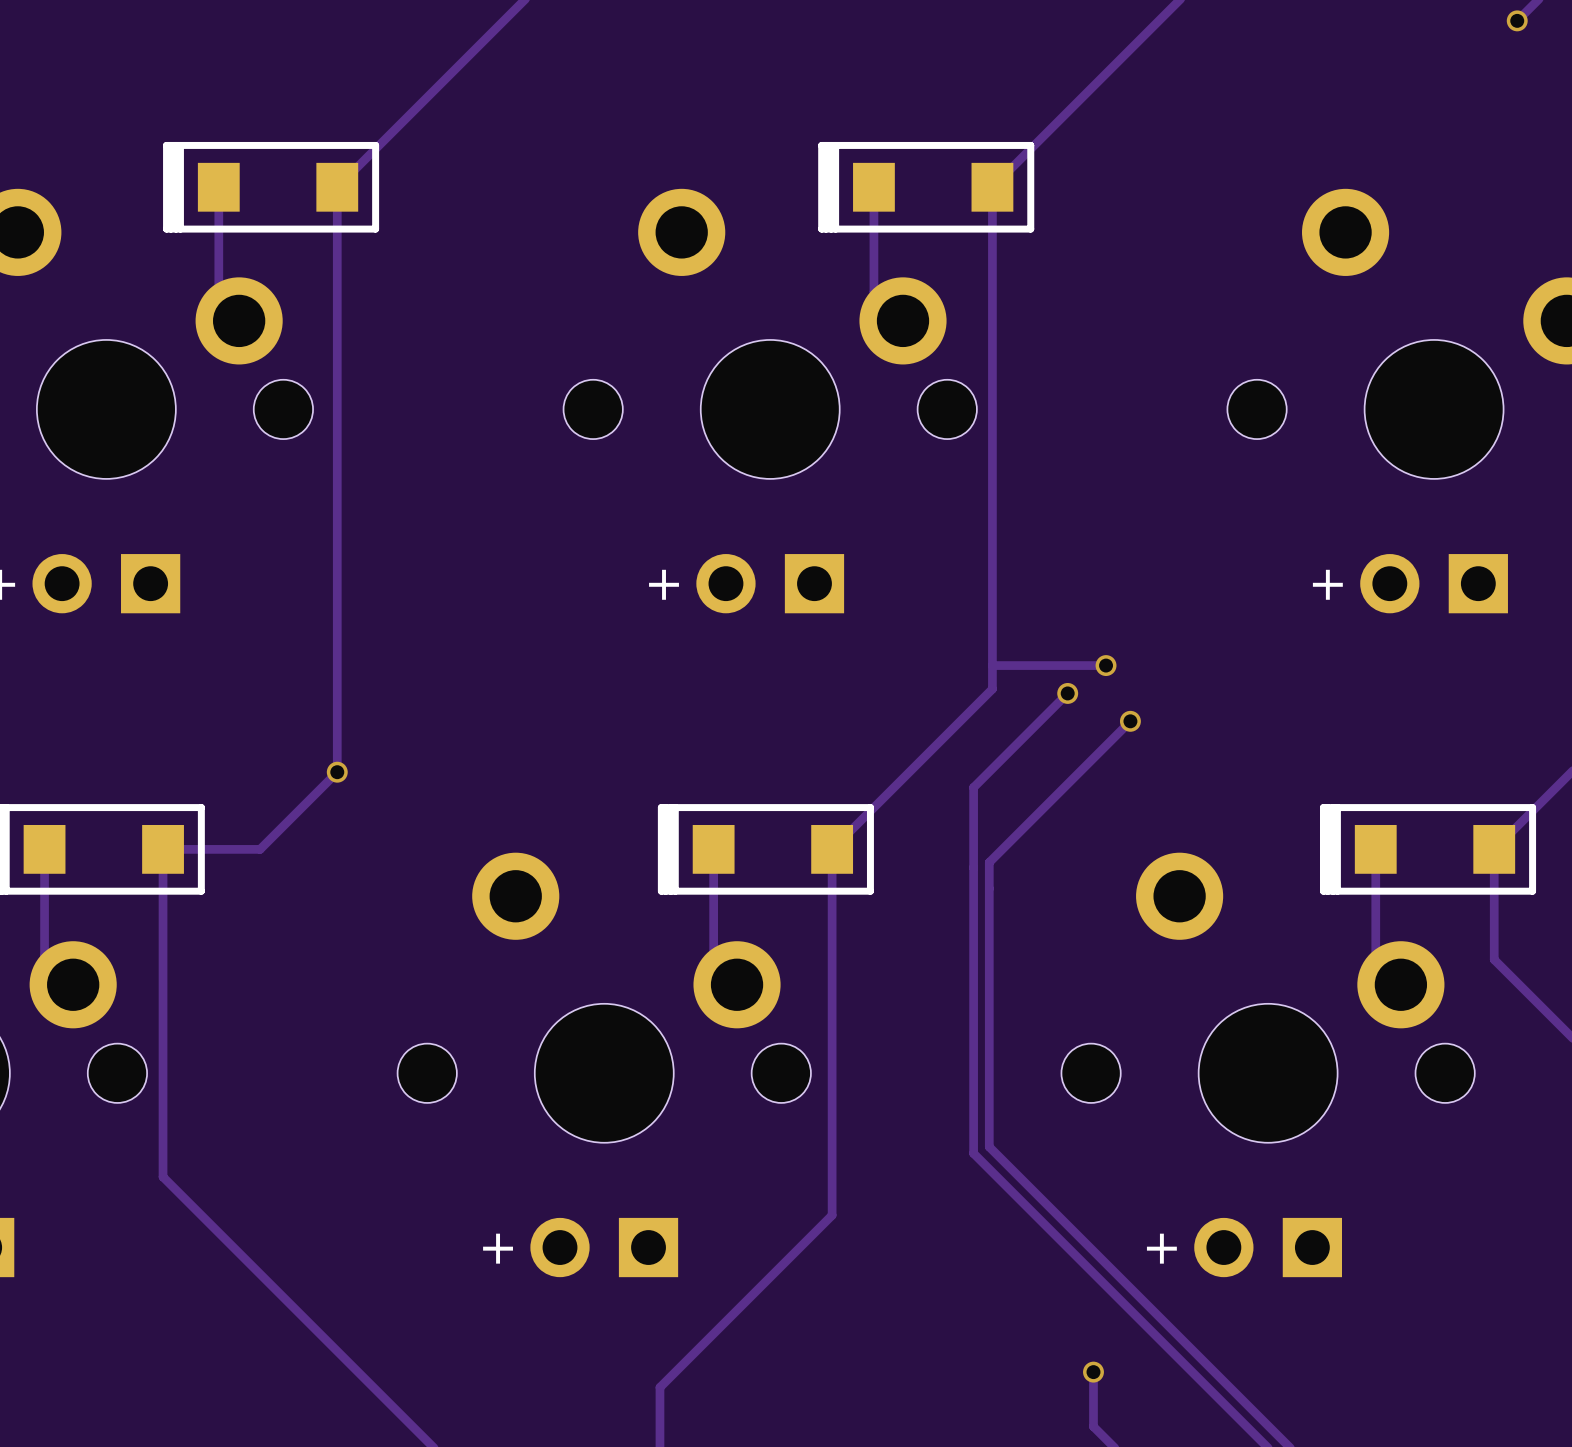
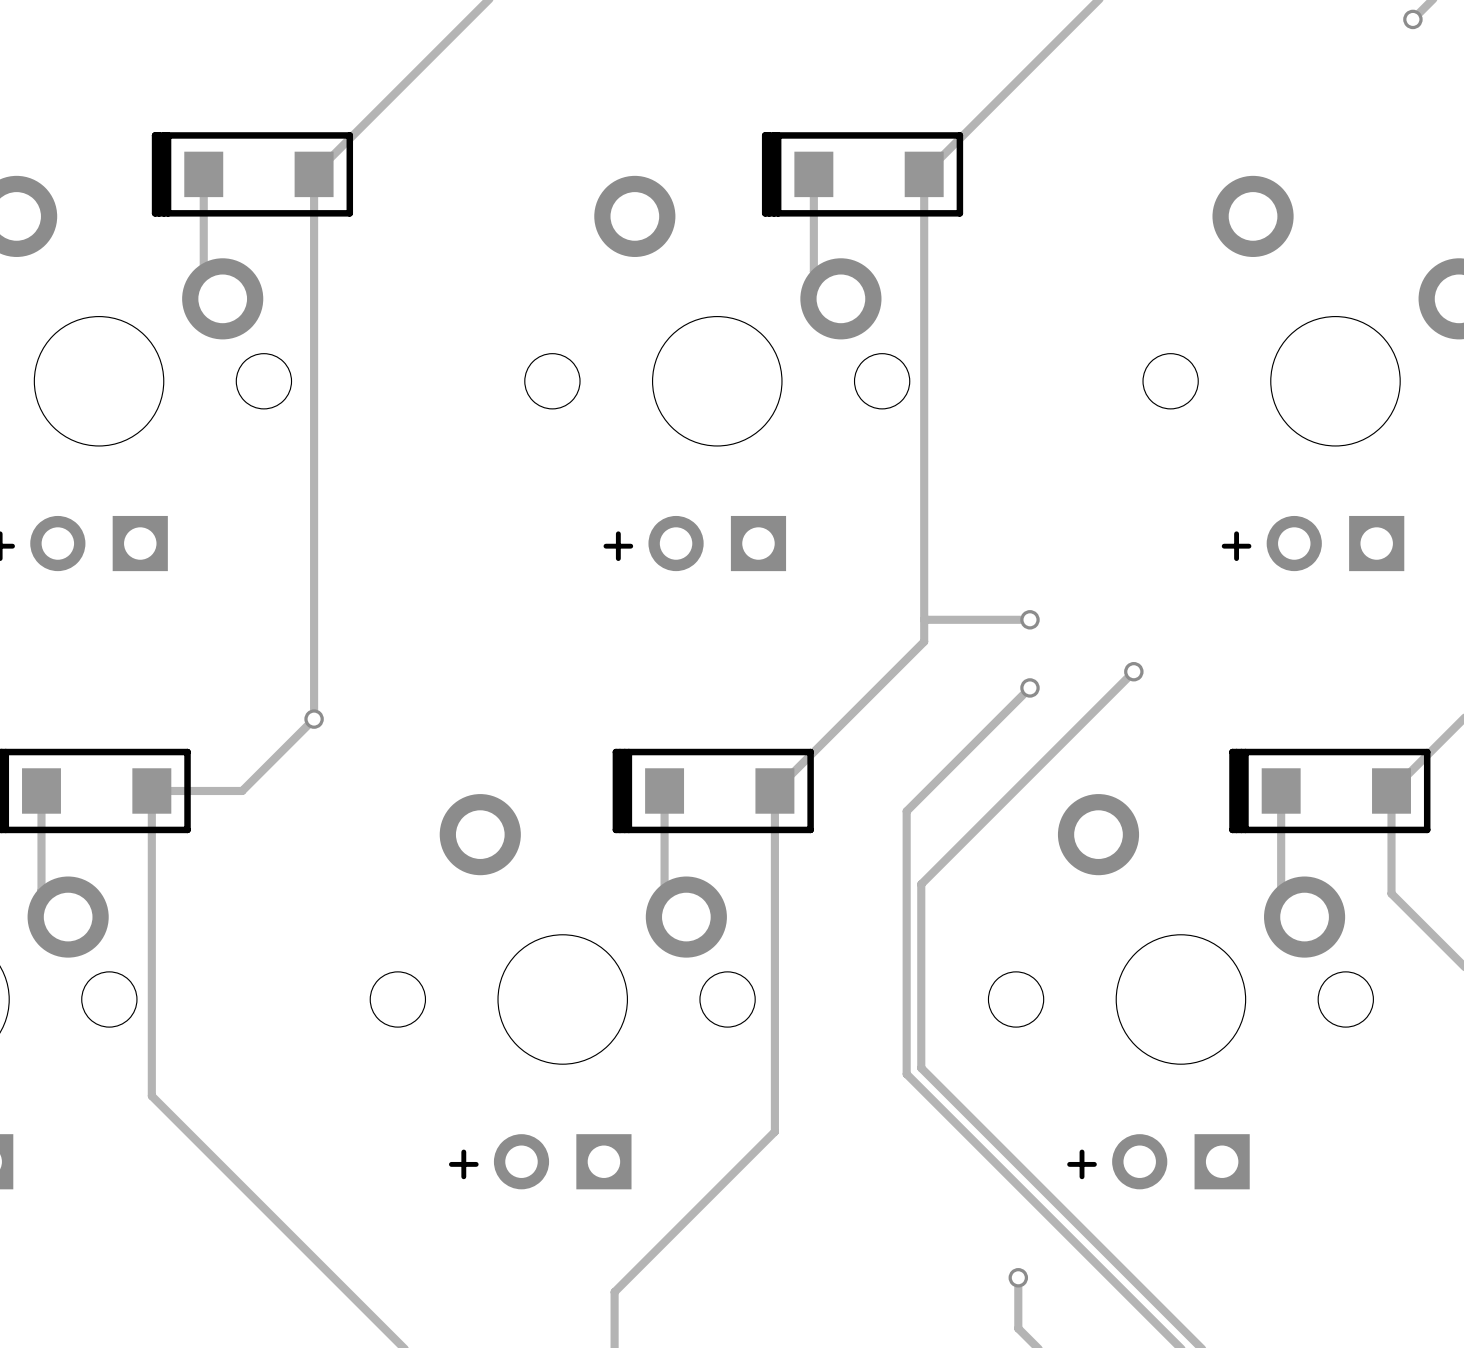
track: (1067, 693) (973, 787) (973, 871) -> (1029, 687) (906, 811)
via: (1067, 693) -> none
track: (1130, 721) (989, 862) (989, 949) -> (1133, 671) (921, 884)
via: (1130, 721) -> none
via: none -> (1133, 671)
via: none -> (1029, 687)

